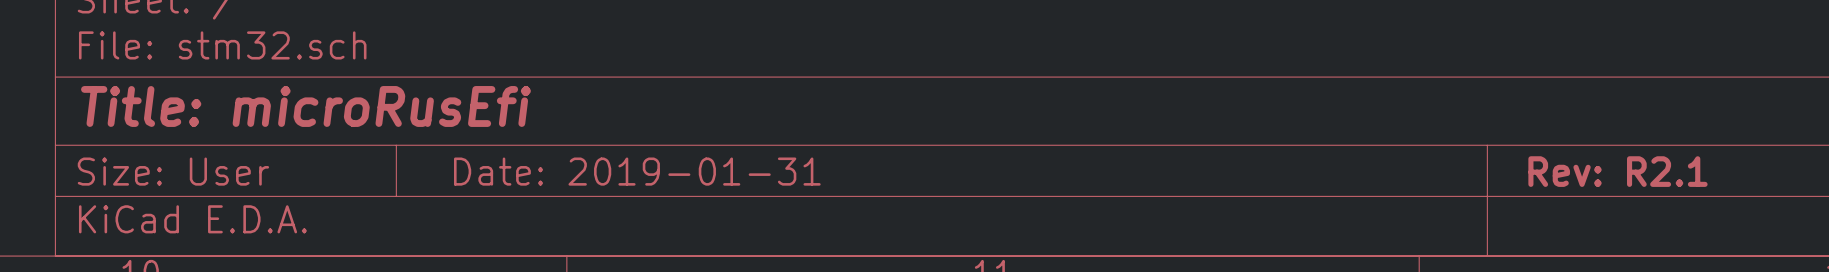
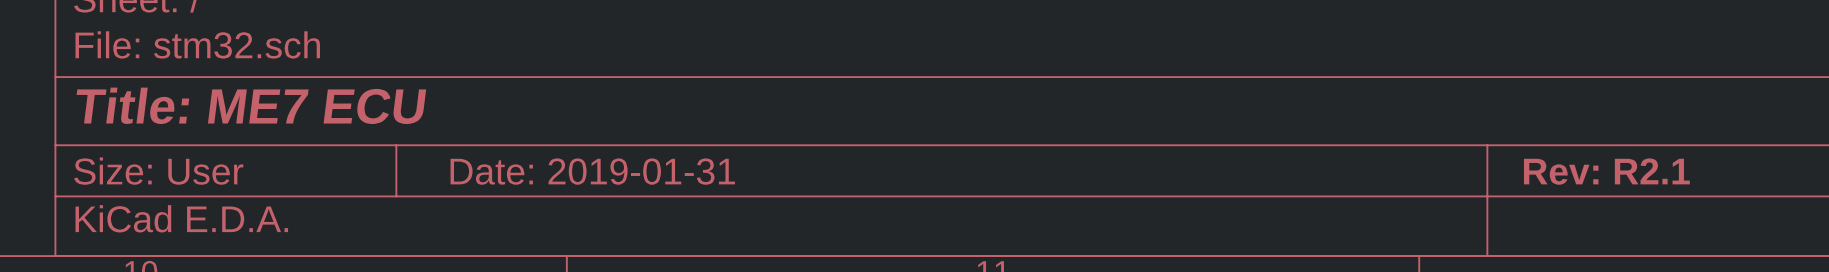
title block: Title: microRusEfi (305, 106) -> Title: ME7 ECU (251, 105)

